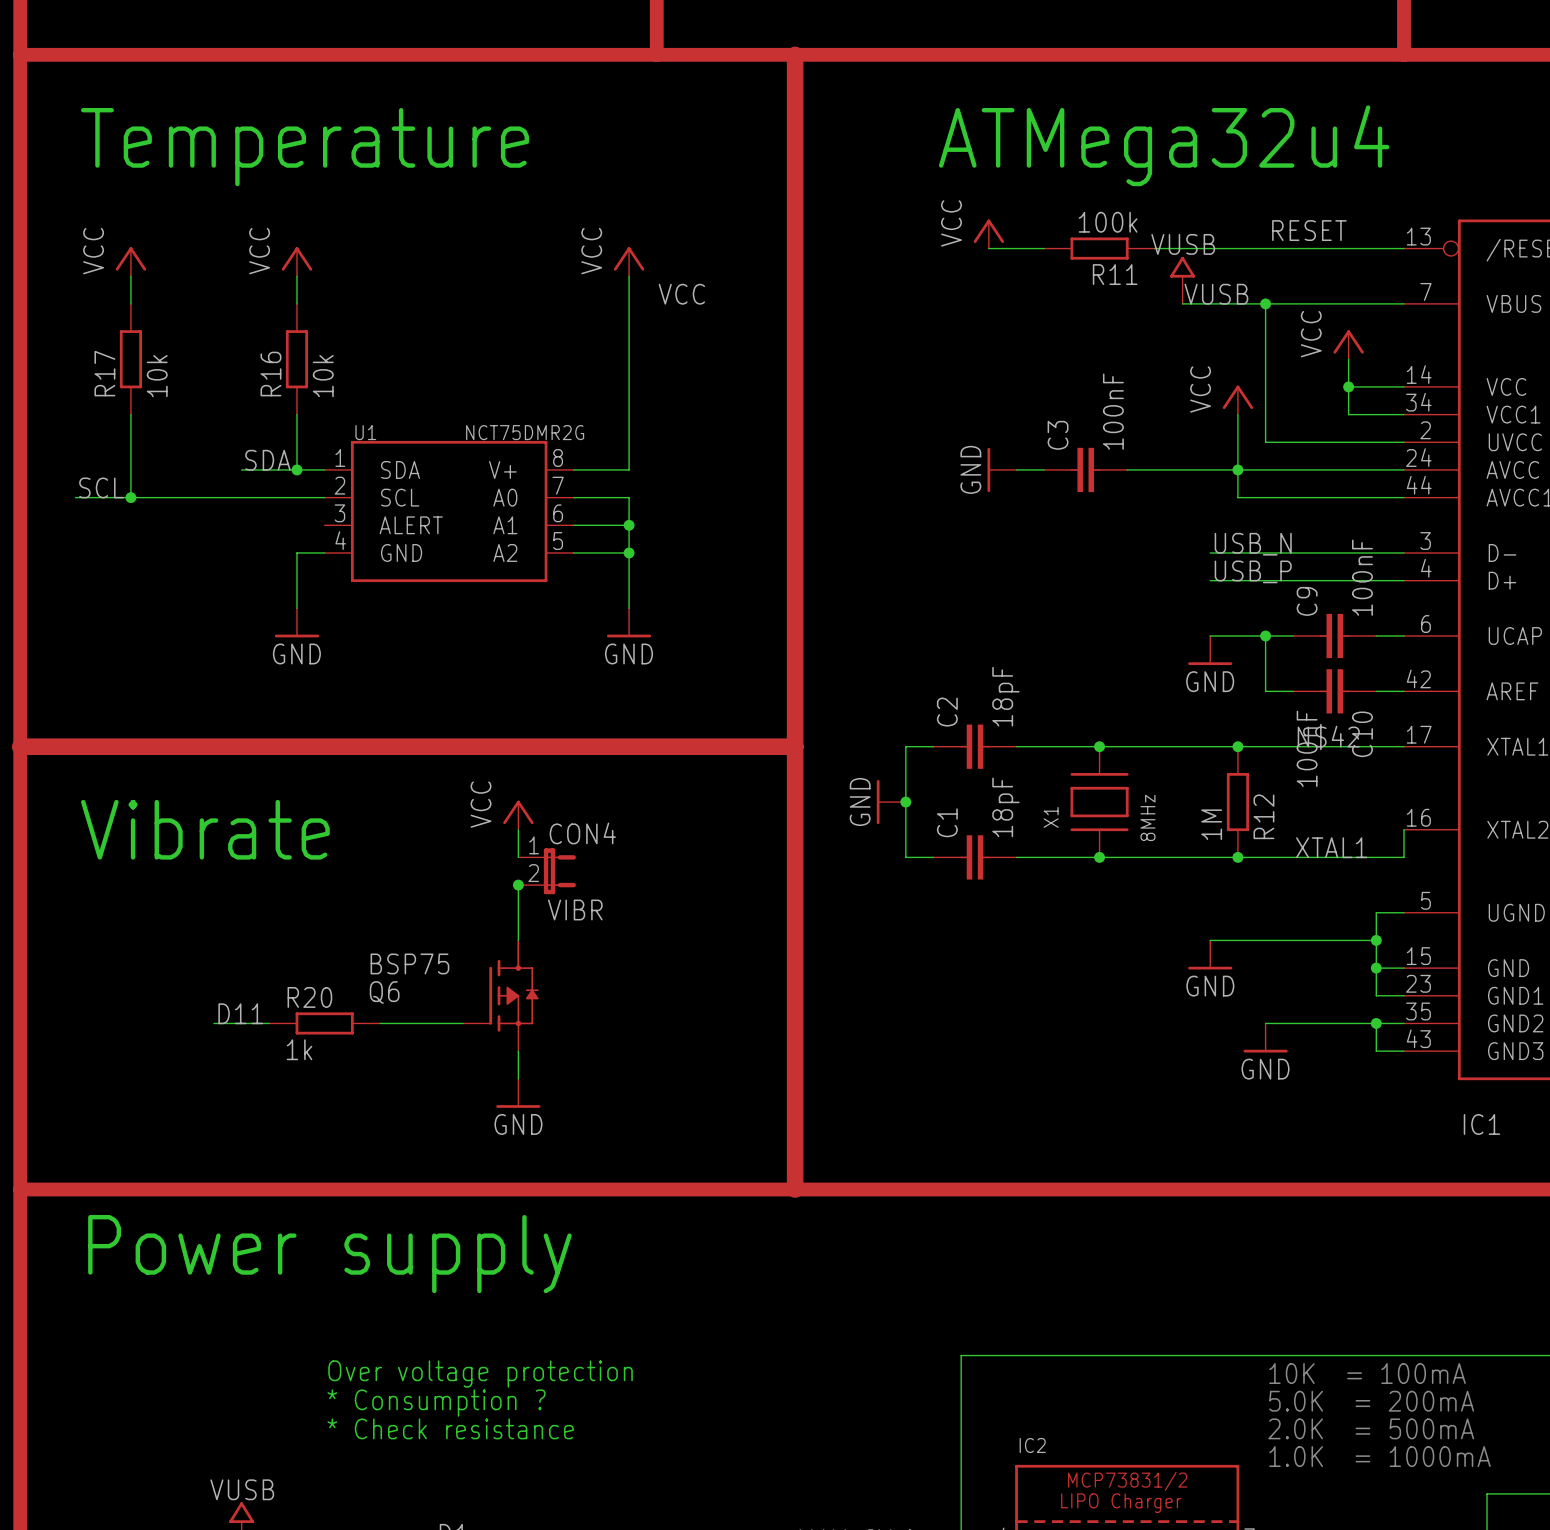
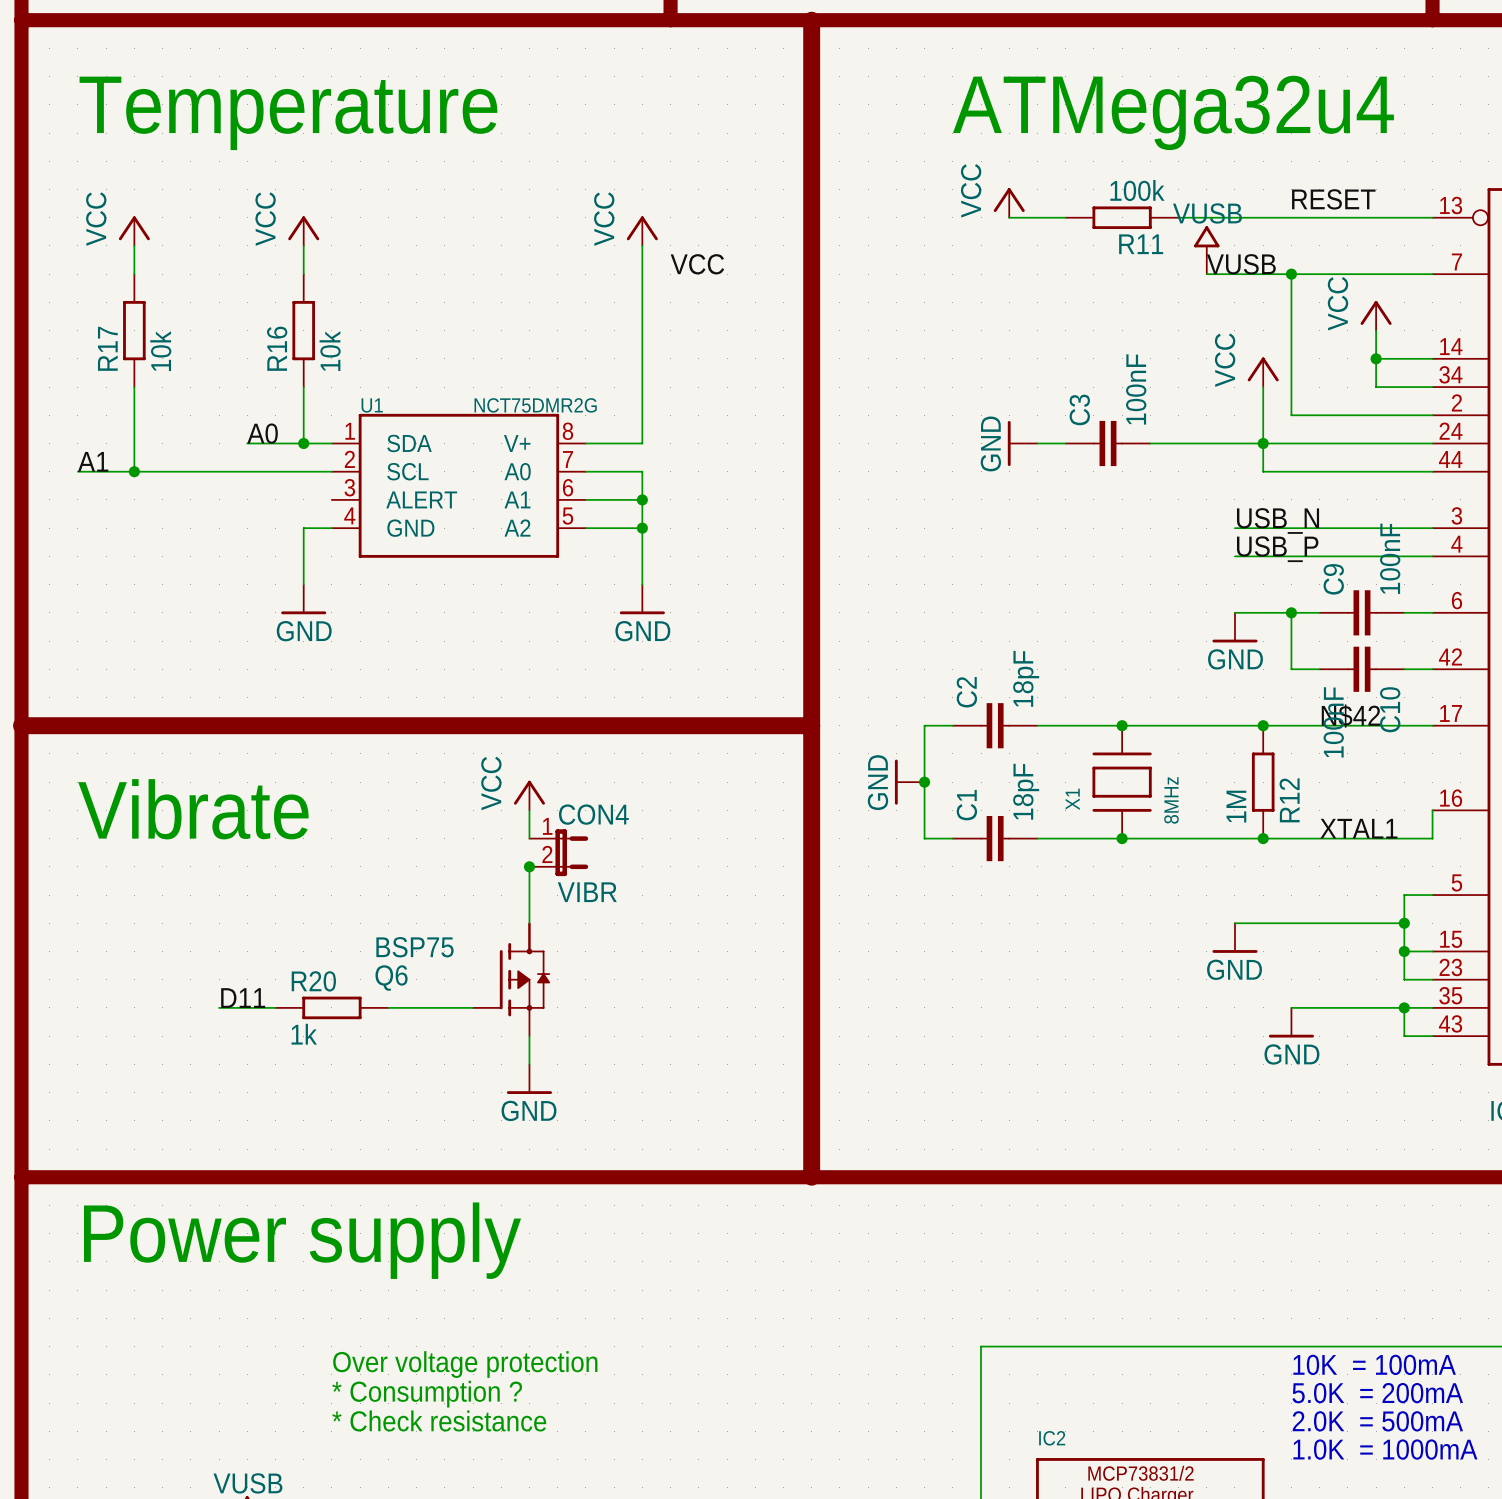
label: SDA (267, 460) -> A0 (262, 433)
label: SCL (101, 487) -> A1 (93, 461)

